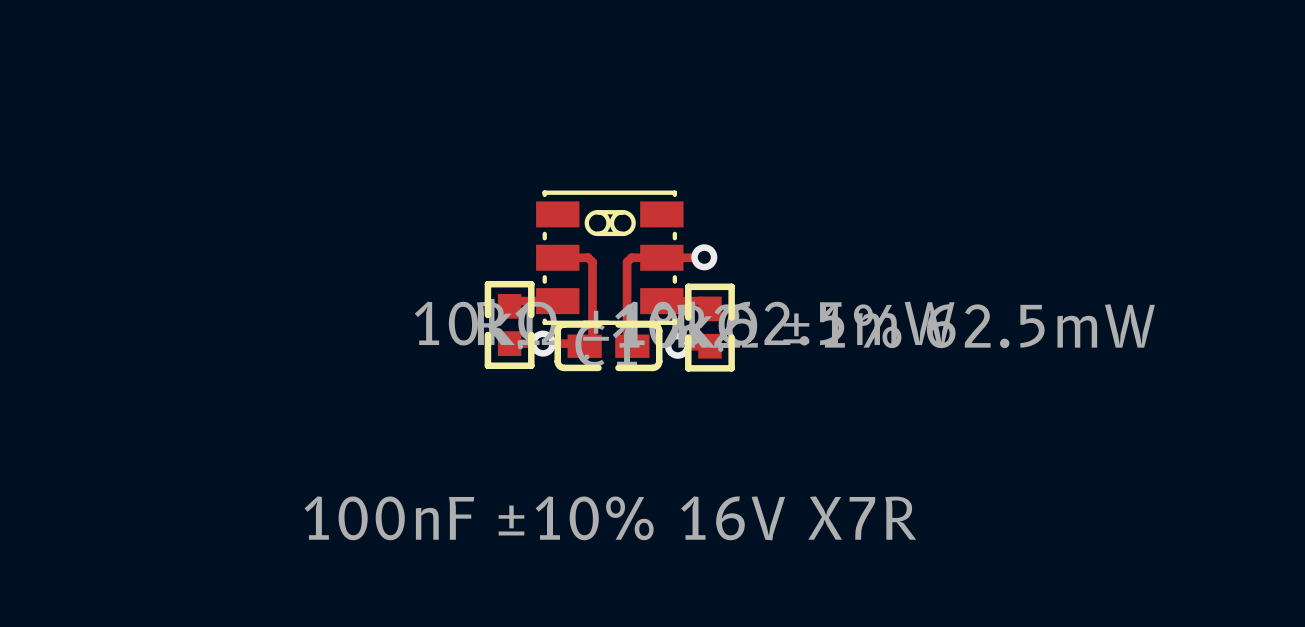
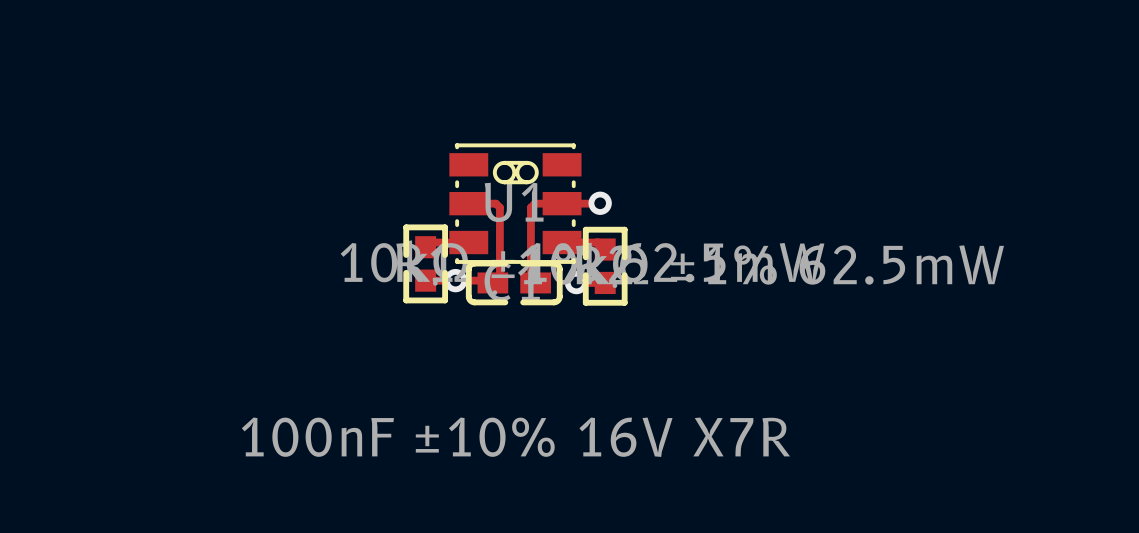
U1 name: none -> U1 (514, 202)

